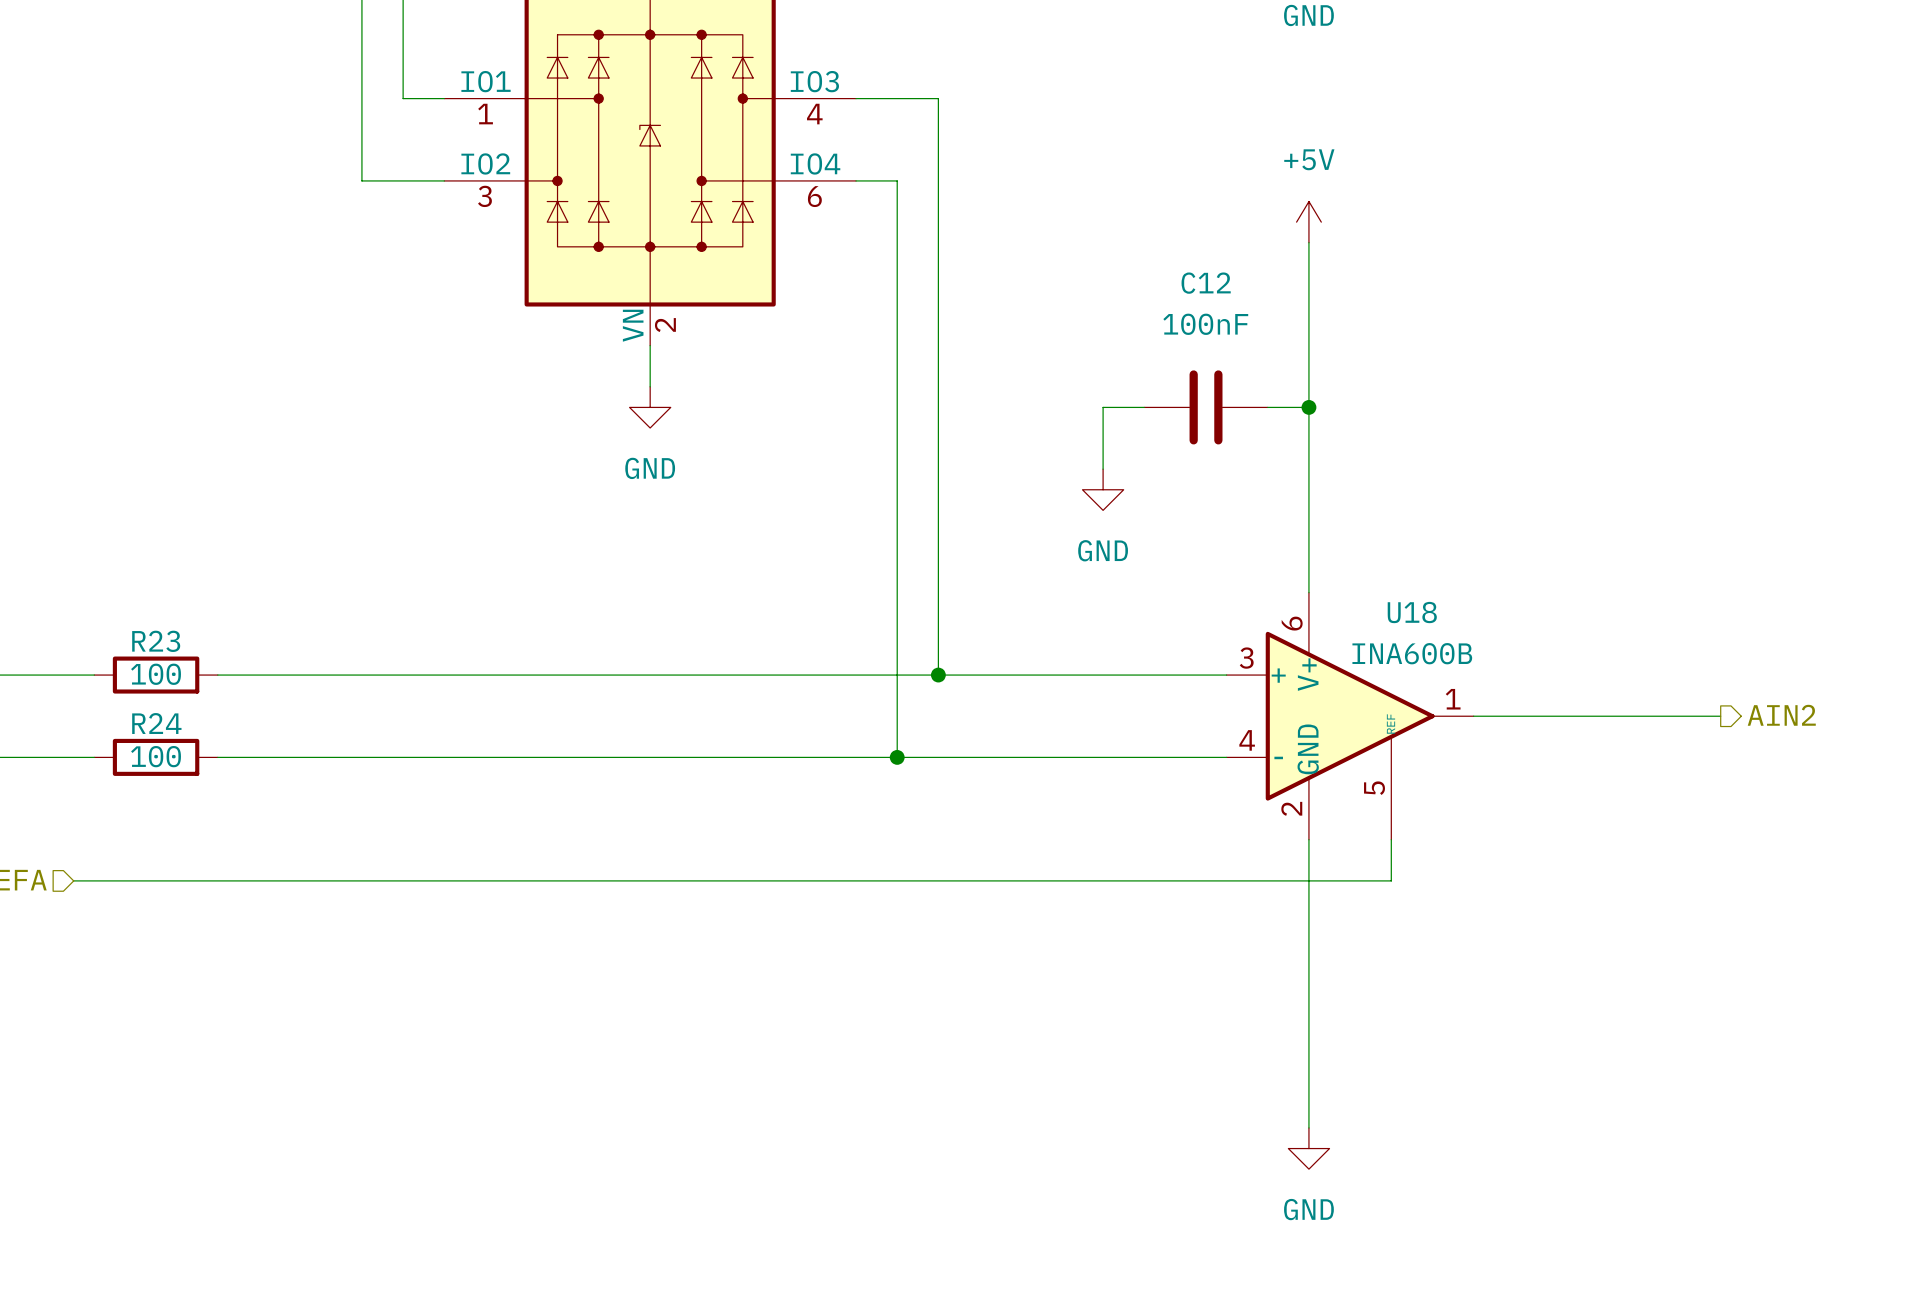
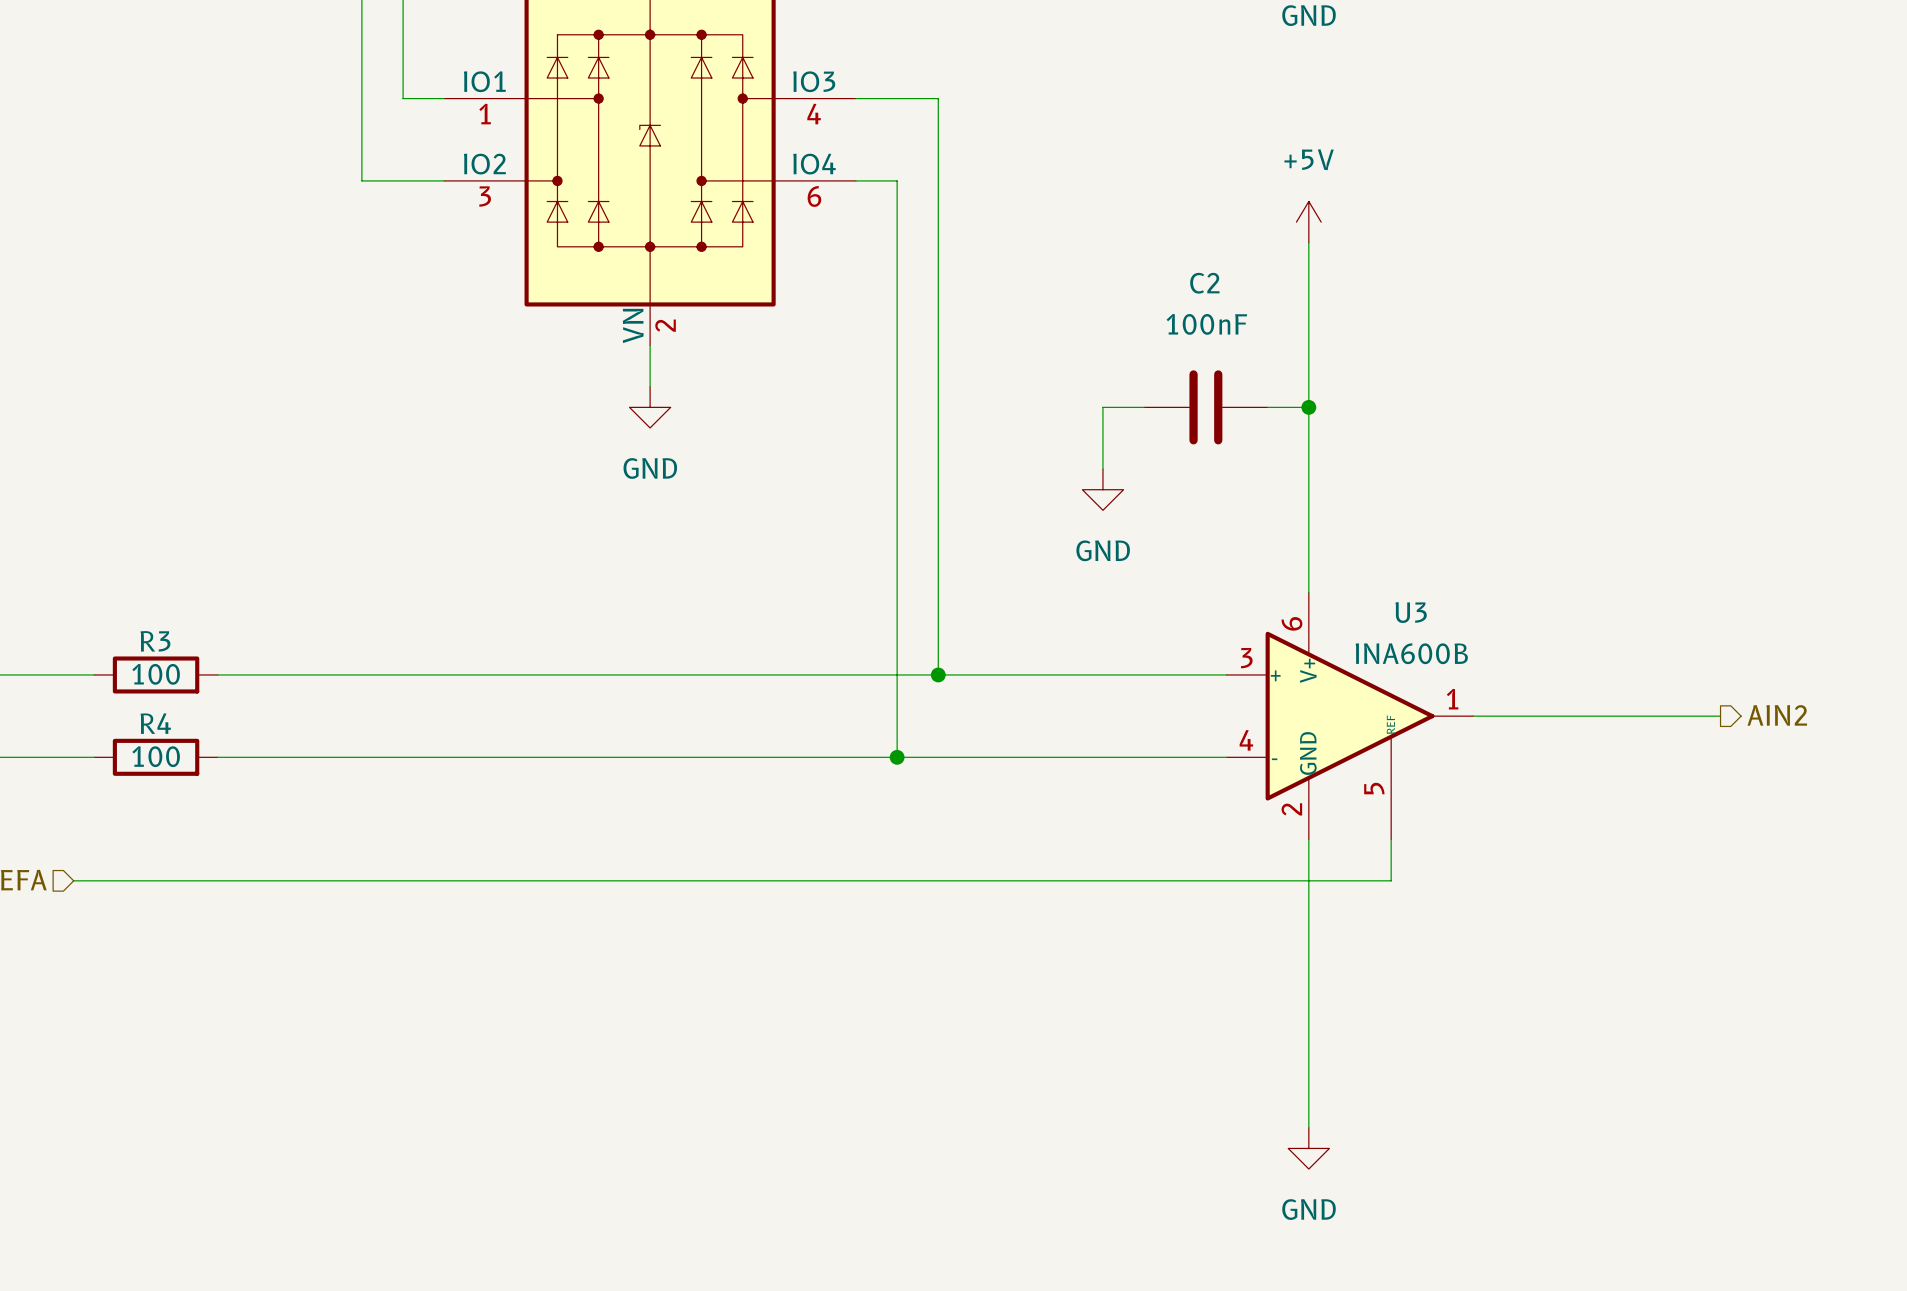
C12 name: C12 (1206, 283) -> C2 (1204, 283)
U18 symbol: [1226, 592, 1474, 840] -> [1226, 592, 1474, 840]
U18 name: U18 (1412, 612) -> U3 (1411, 612)
R23 name: R23 (156, 641) -> R3 (155, 641)
R24 name: R24 (156, 723) -> R4 (155, 723)

